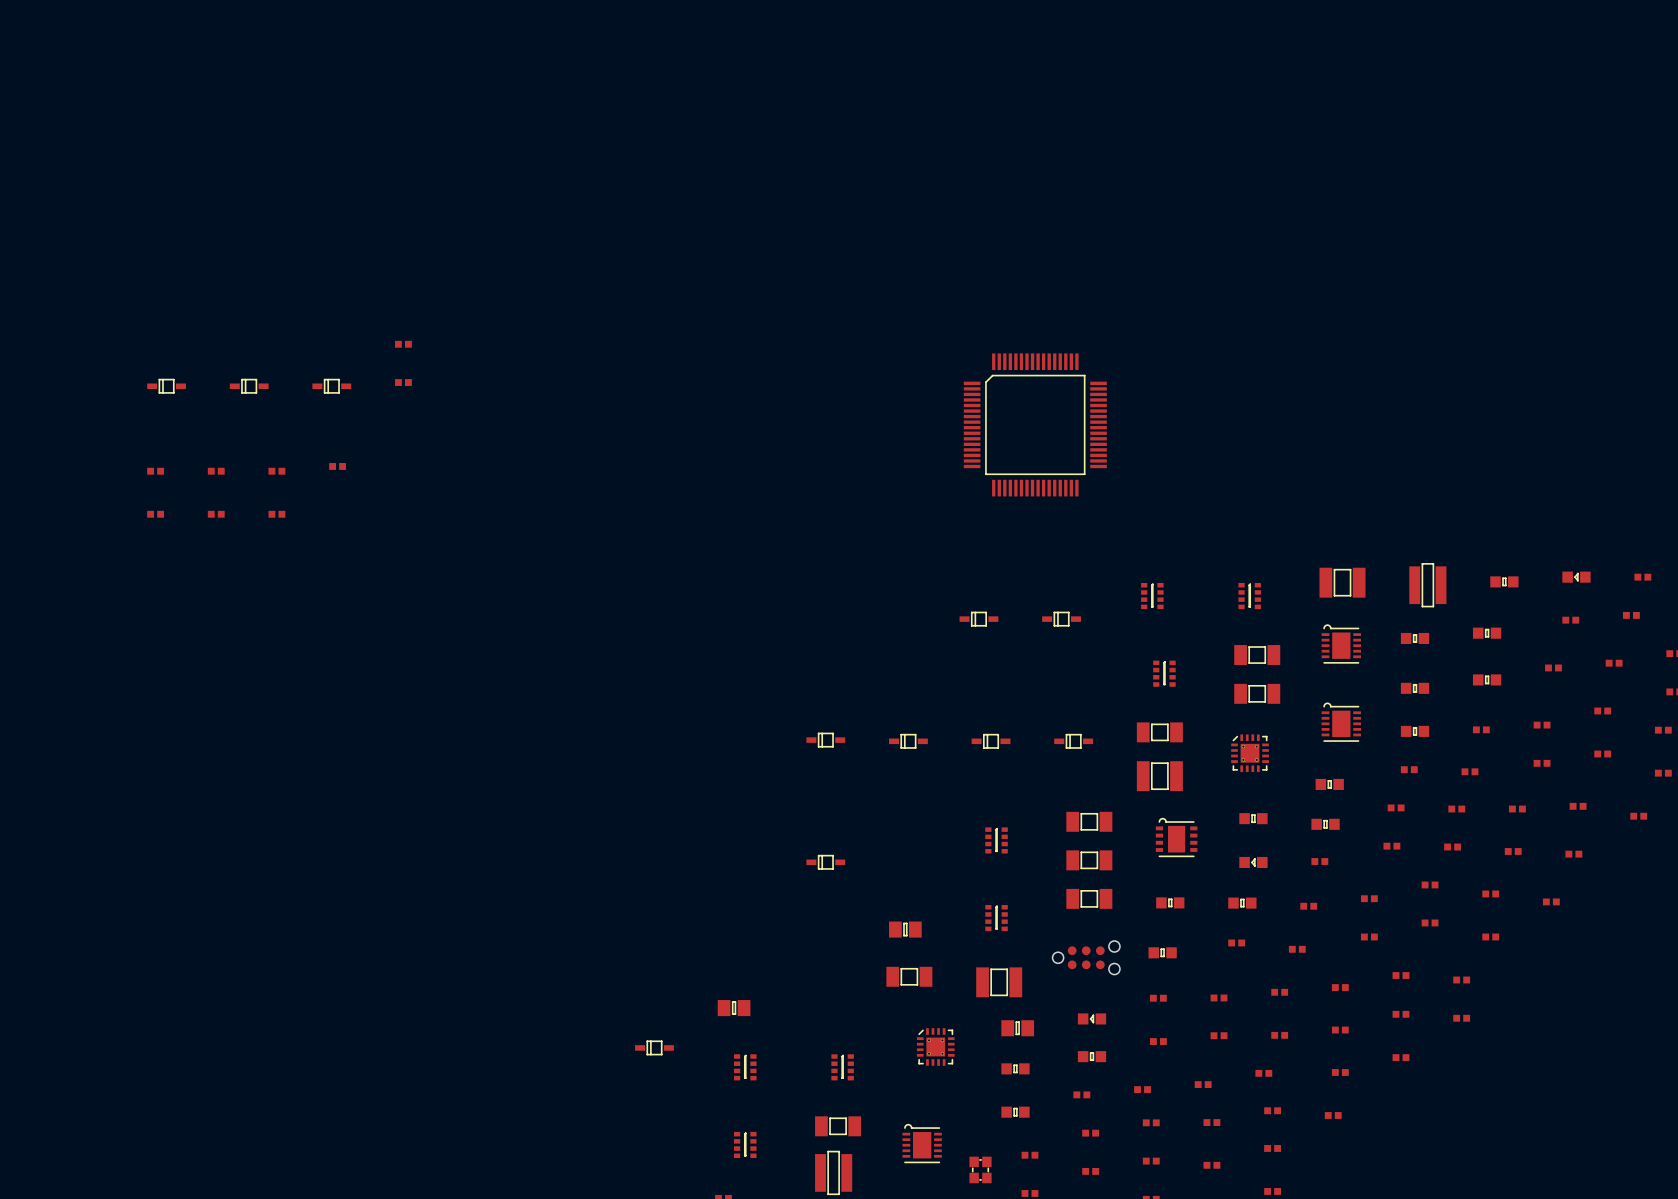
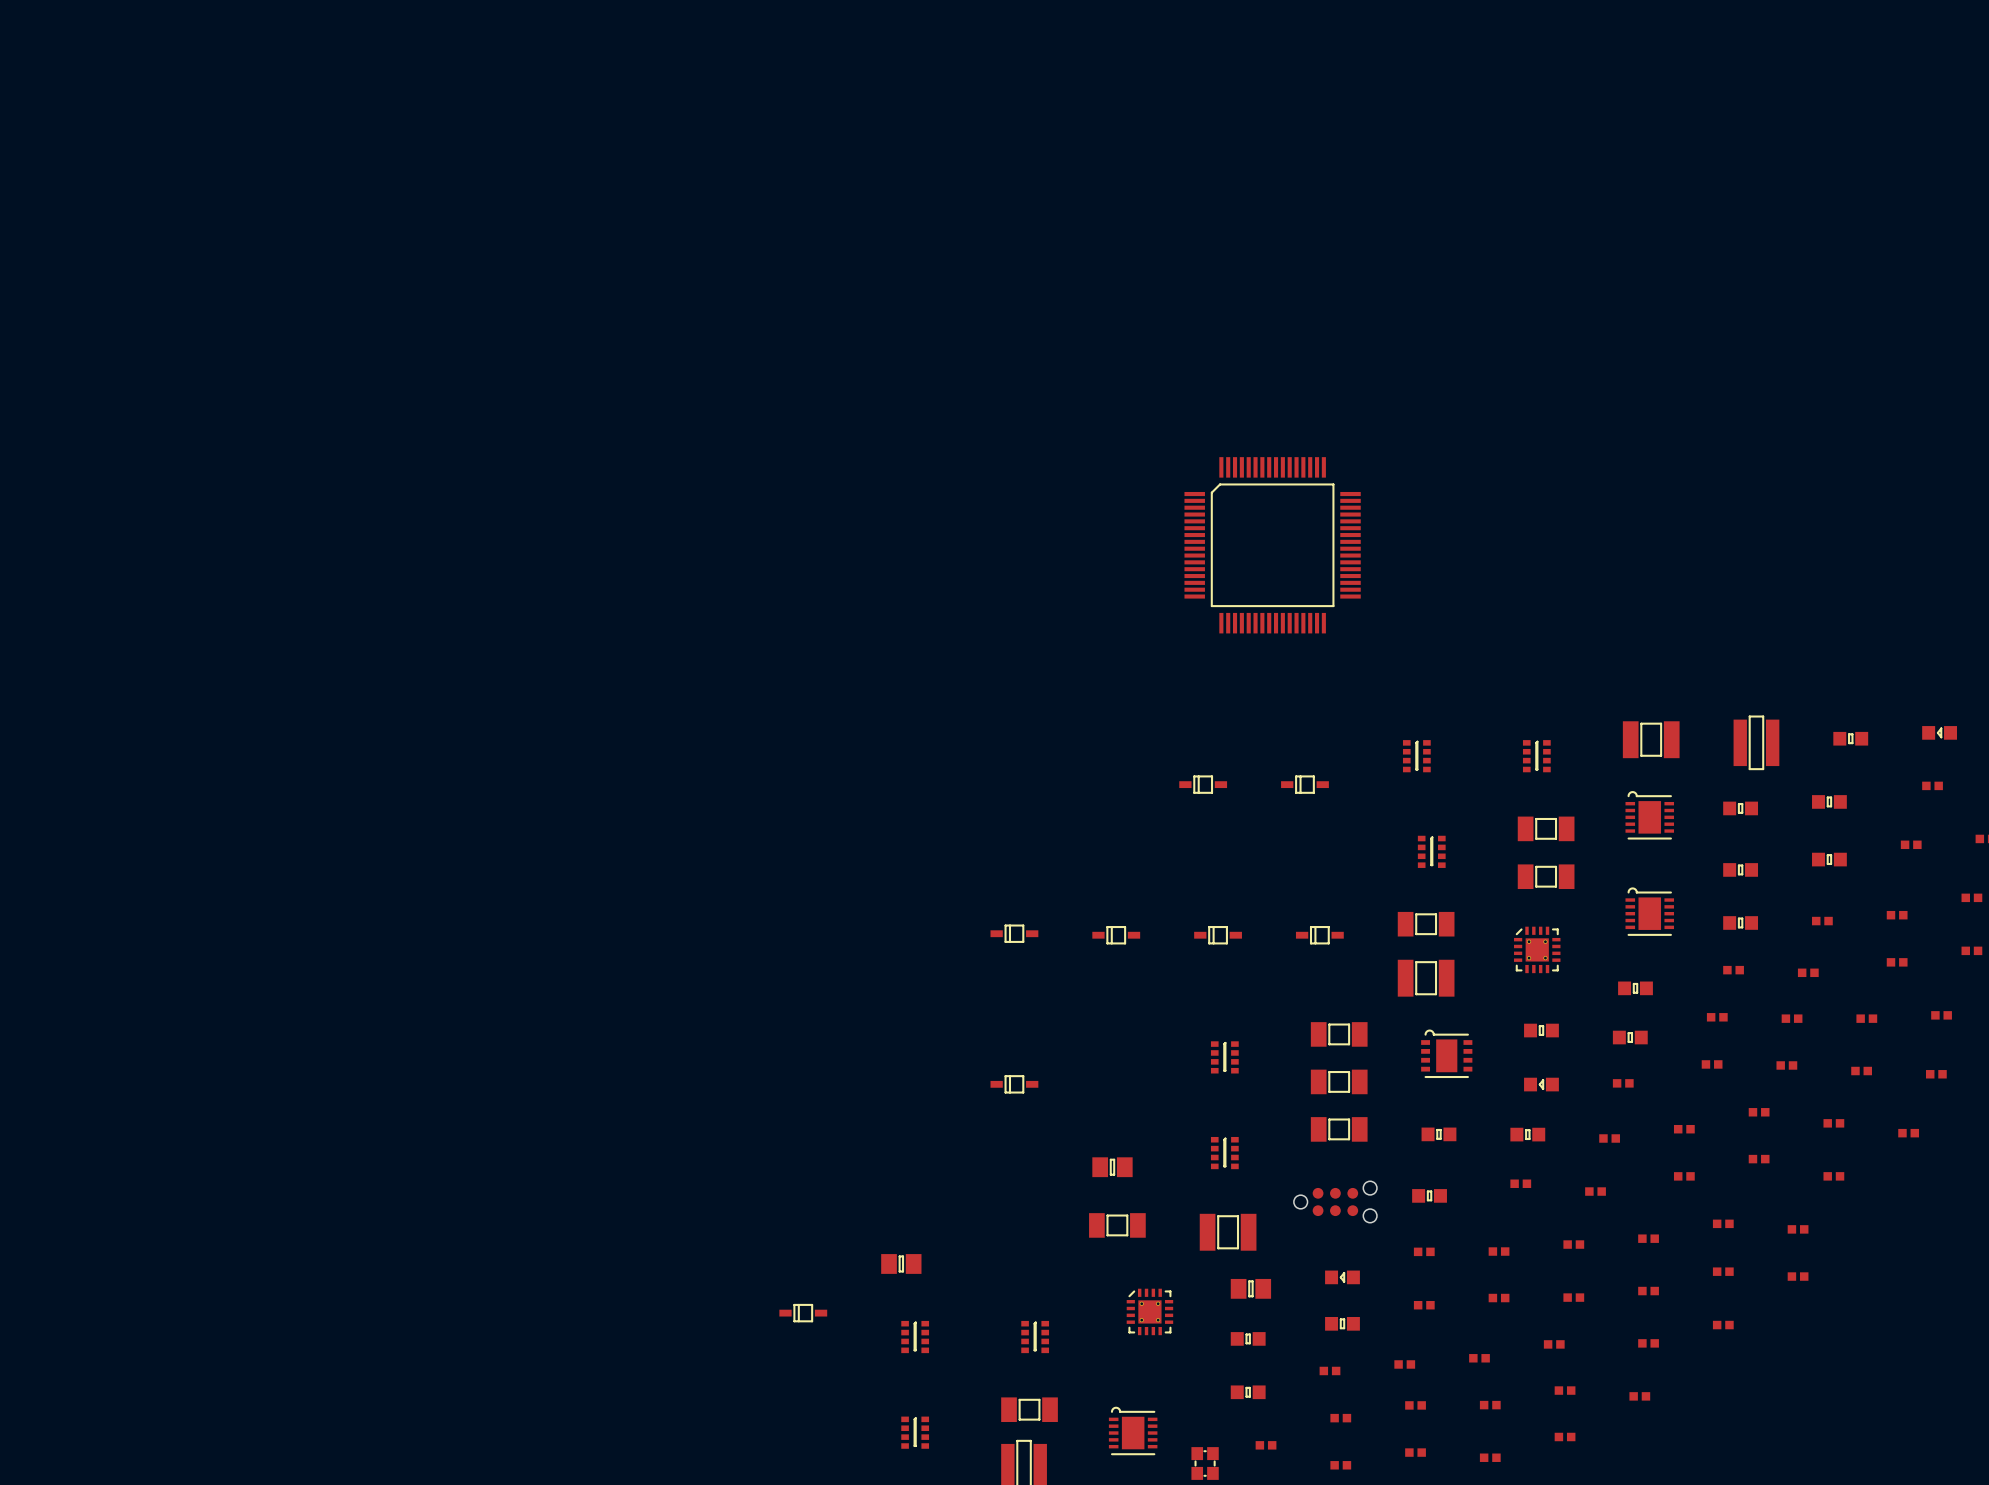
part: (403, 344) -> none
part: (403, 382) -> none
part: (166, 386) -> none
part: (249, 386) -> none
part: (331, 386) -> none
part: (337, 466) -> none
part: (155, 471) -> none
part: (216, 471) -> none
part: (276, 471) -> none
part: (155, 514) -> none
part: (216, 514) -> none
part: (276, 514) -> none

